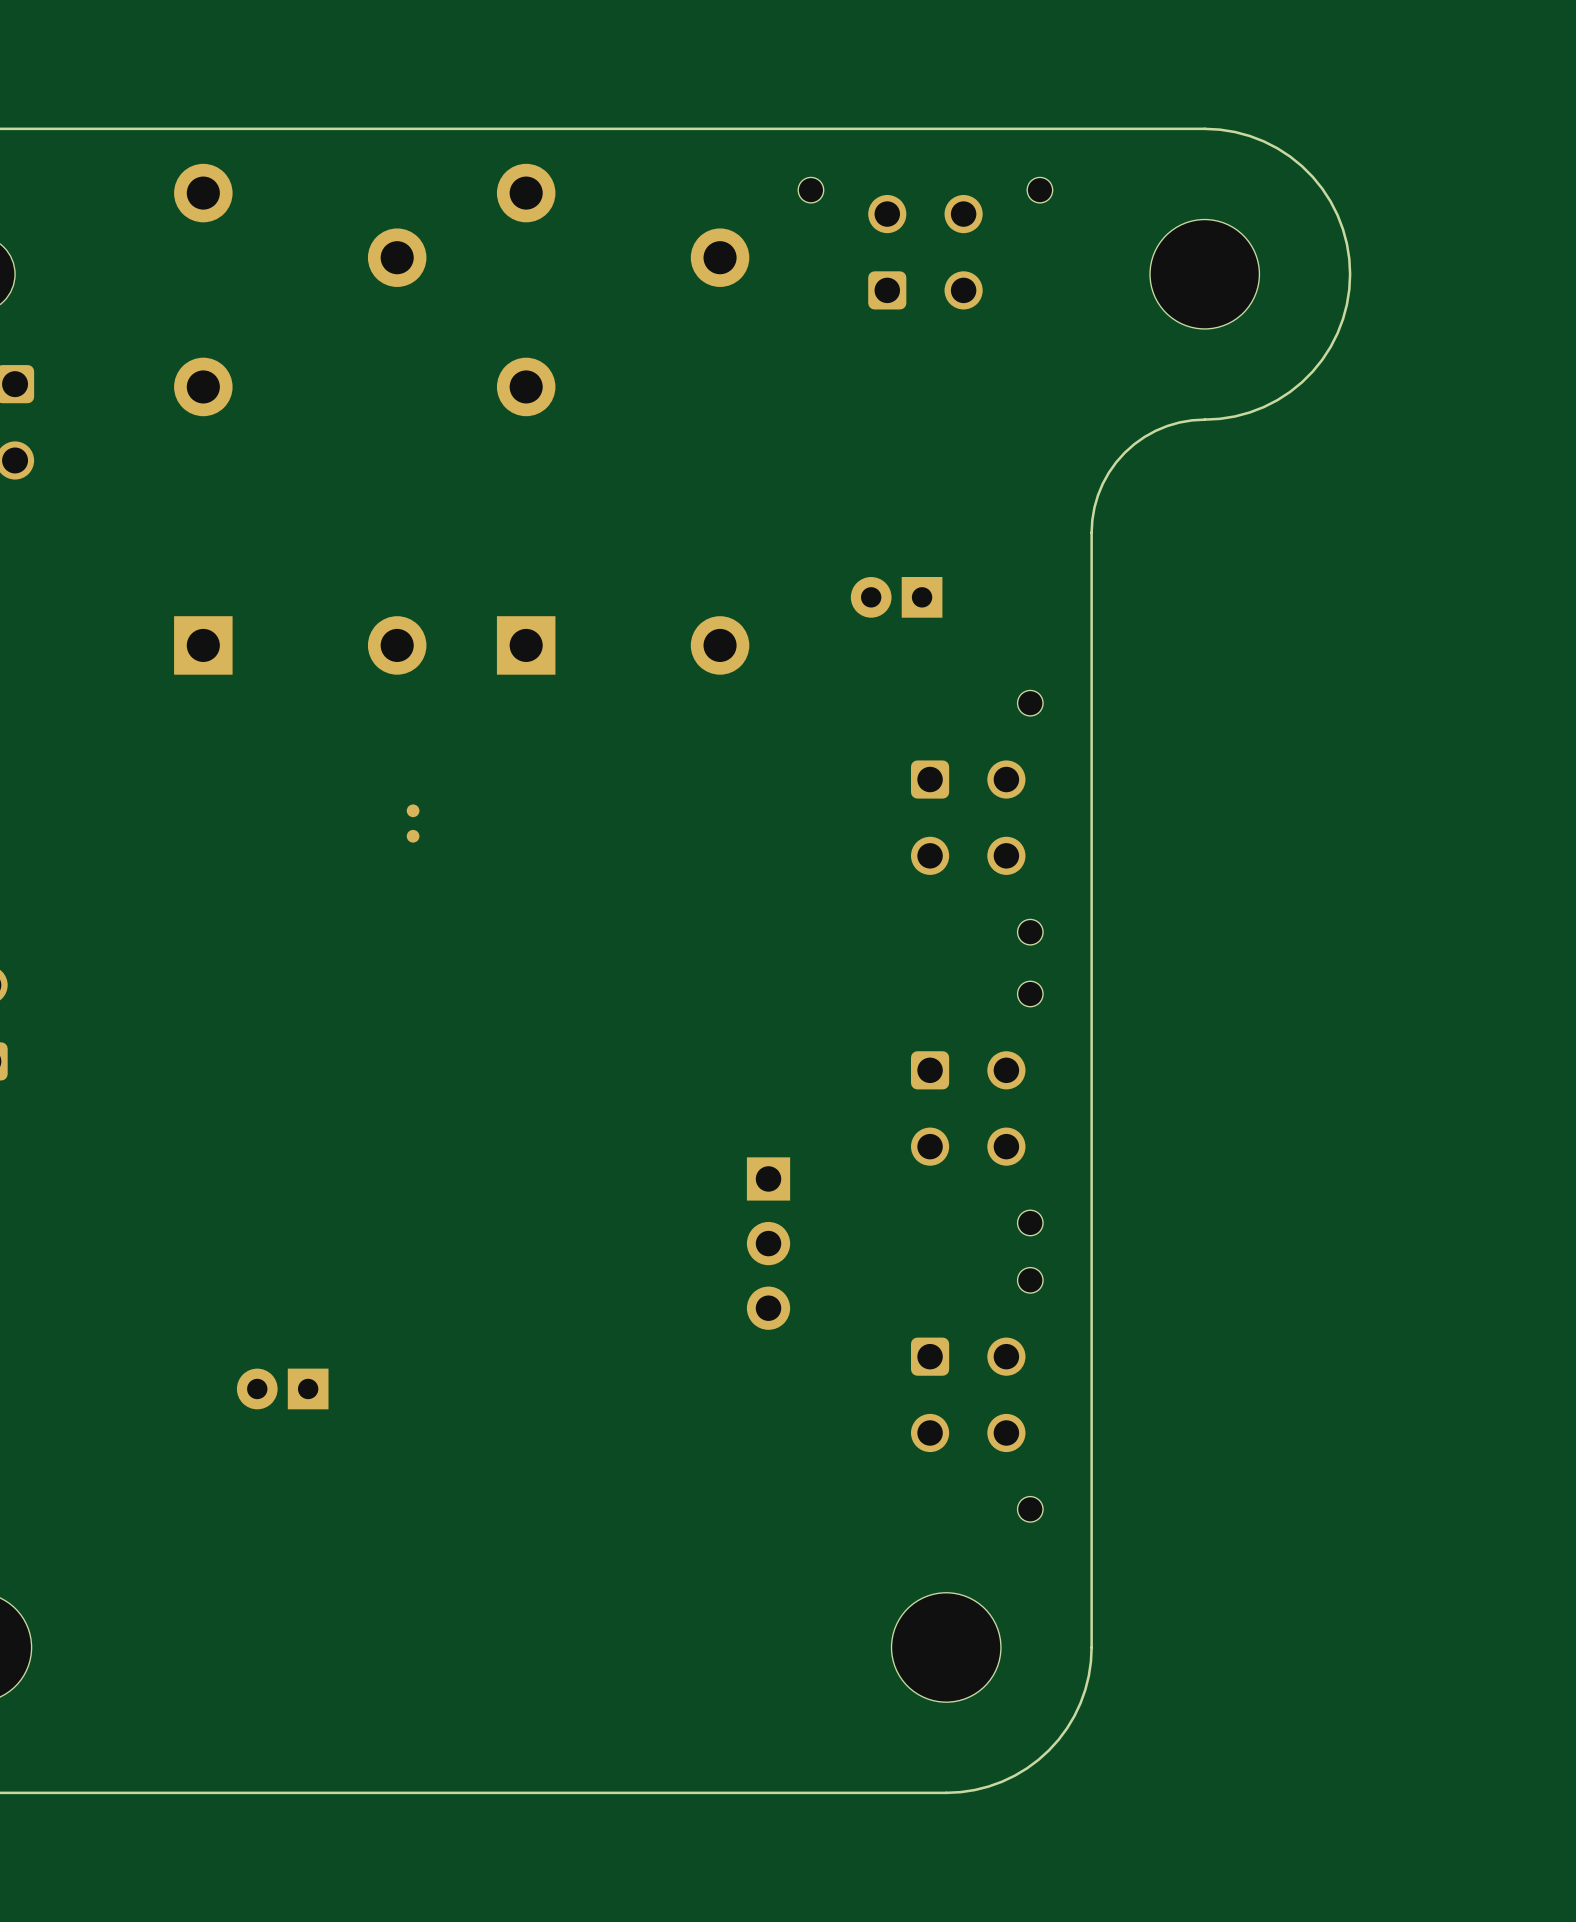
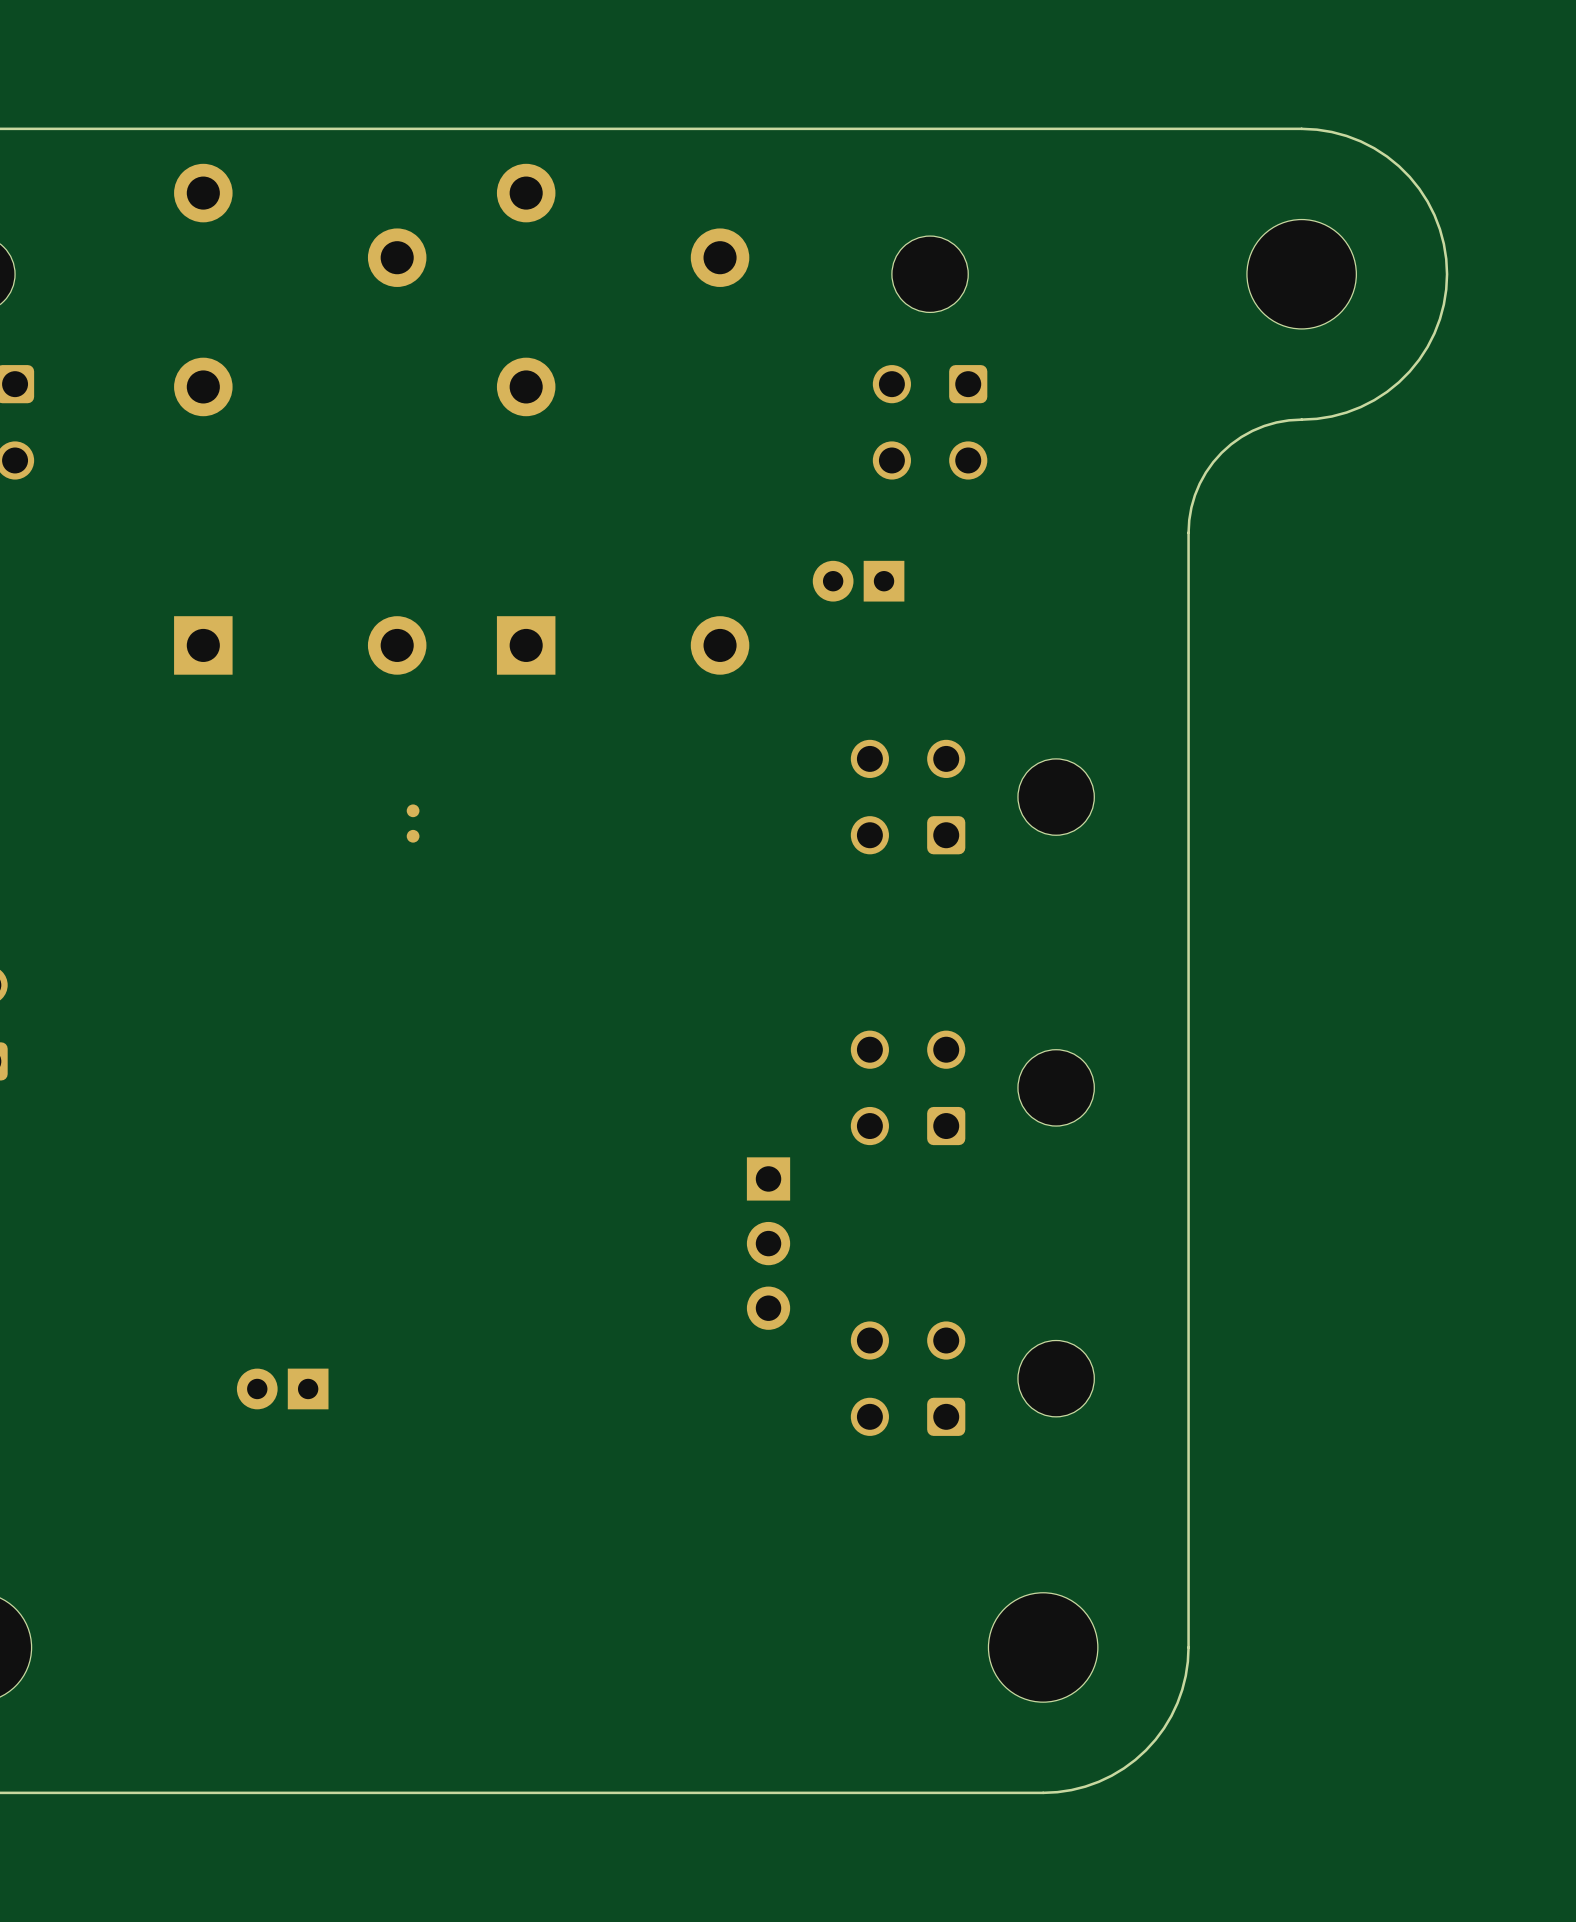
board edge: (1204, 128) (1234, 132) (1263, 141) (1290, 156) (1312, 176) (1330, 201) (1343, 229) (1349, 259) (1349, 289) (1343, 319) (1337, 333) (1322, 359) (1302, 382) (1277, 400) (1249, 412) (1219, 418) (1179, 422) (1144, 436) (1116, 462) (1102, 483) (1094, 507) (1091, 532) (1090, 1661) (1080, 1703) (1067, 1728) (1049, 1750) (1027, 1768) (1001, 1781) (974, 1790) (946, 1792) -> (1204, 128) (1316, 129) (1346, 135) (1374, 148) (1387, 156) (1409, 176) (1427, 201) (1434, 215) (1443, 244) (1447, 274) (1446, 289) (1439, 319) (1427, 346) (1409, 371) (1398, 382) (1374, 400) (1346, 412) (1316, 418) (1276, 422) (1241, 436) (1221, 452) (1205, 472) (1191, 507) (1188, 532) (1188, 1647) (1182, 1689) (1171, 1716) (1155, 1739) (1123, 1768) (1098, 1781) (1057, 1792) (946, 1792)
part: (925, 243) -> none
part position: (1204, 274) -> (1301, 274)
part: none -> (930, 357)
part position: (896, 597) -> (858, 581)
part footprint: [910, 690, 1044, 945] -> [850, 739, 1095, 855]
part footprint: [910, 981, 1044, 1236] -> [850, 1030, 1095, 1146]
part footprint: [910, 1267, 1044, 1523] -> [850, 1321, 1095, 1436]
part position: (946, 1647) -> (1043, 1647)

